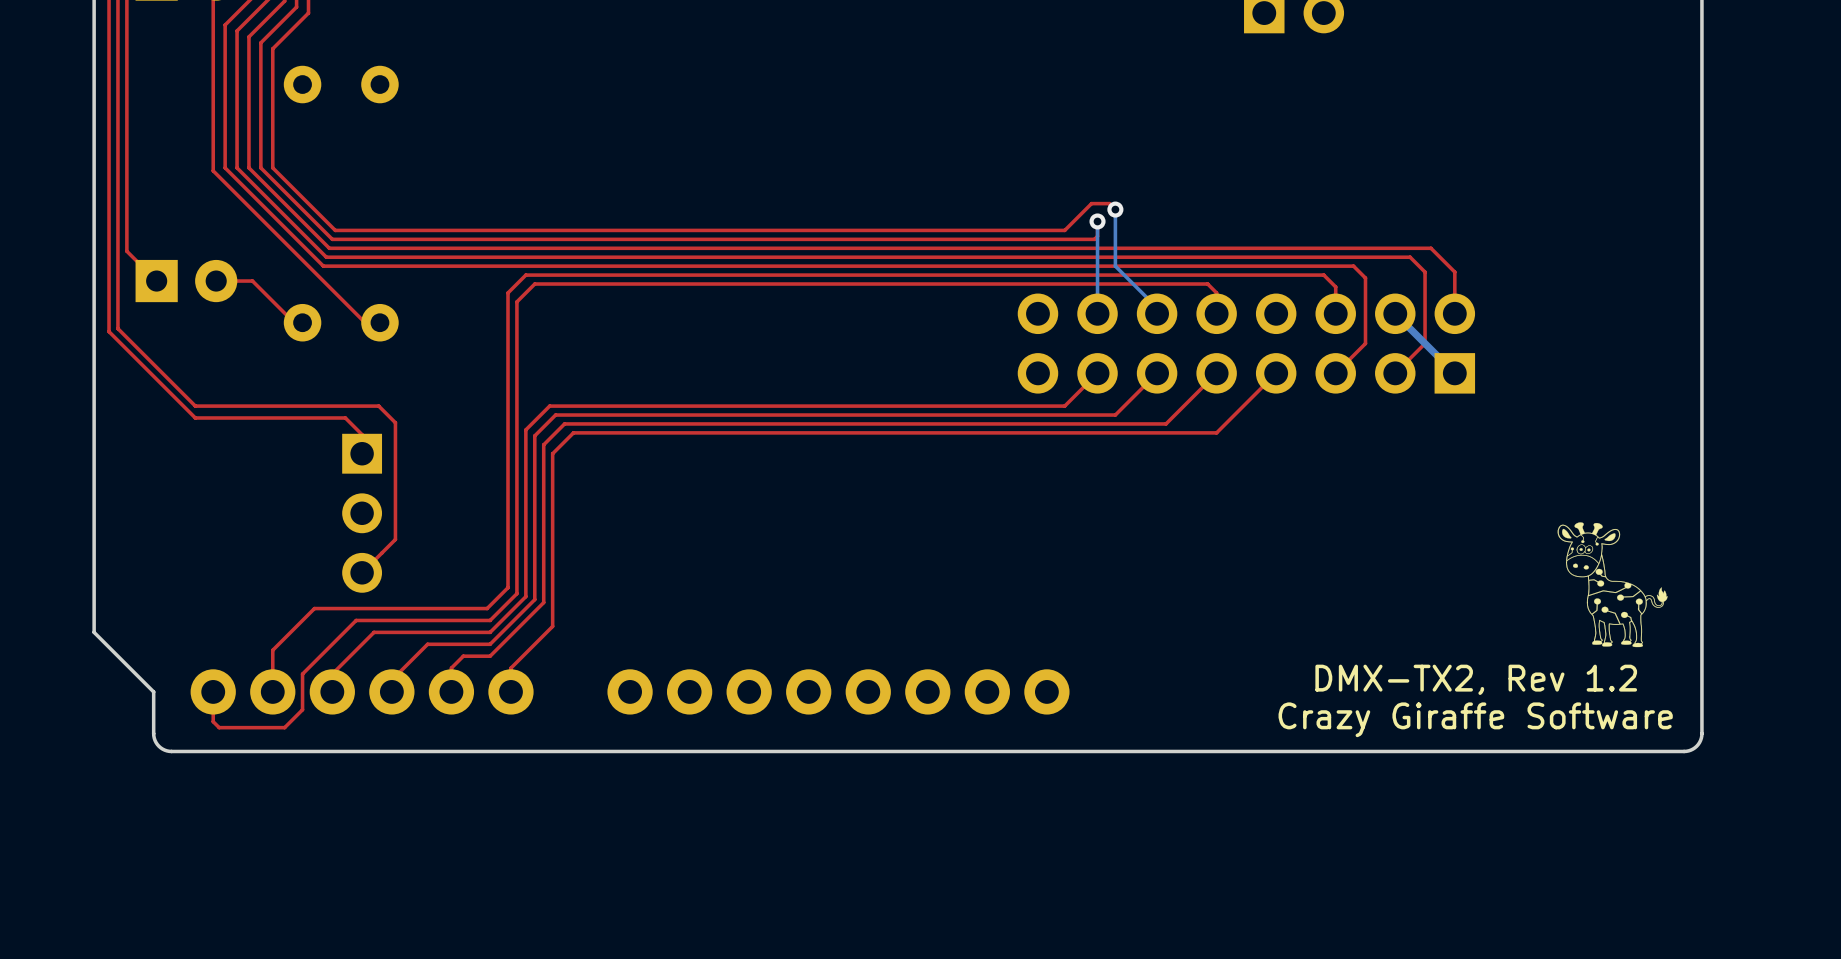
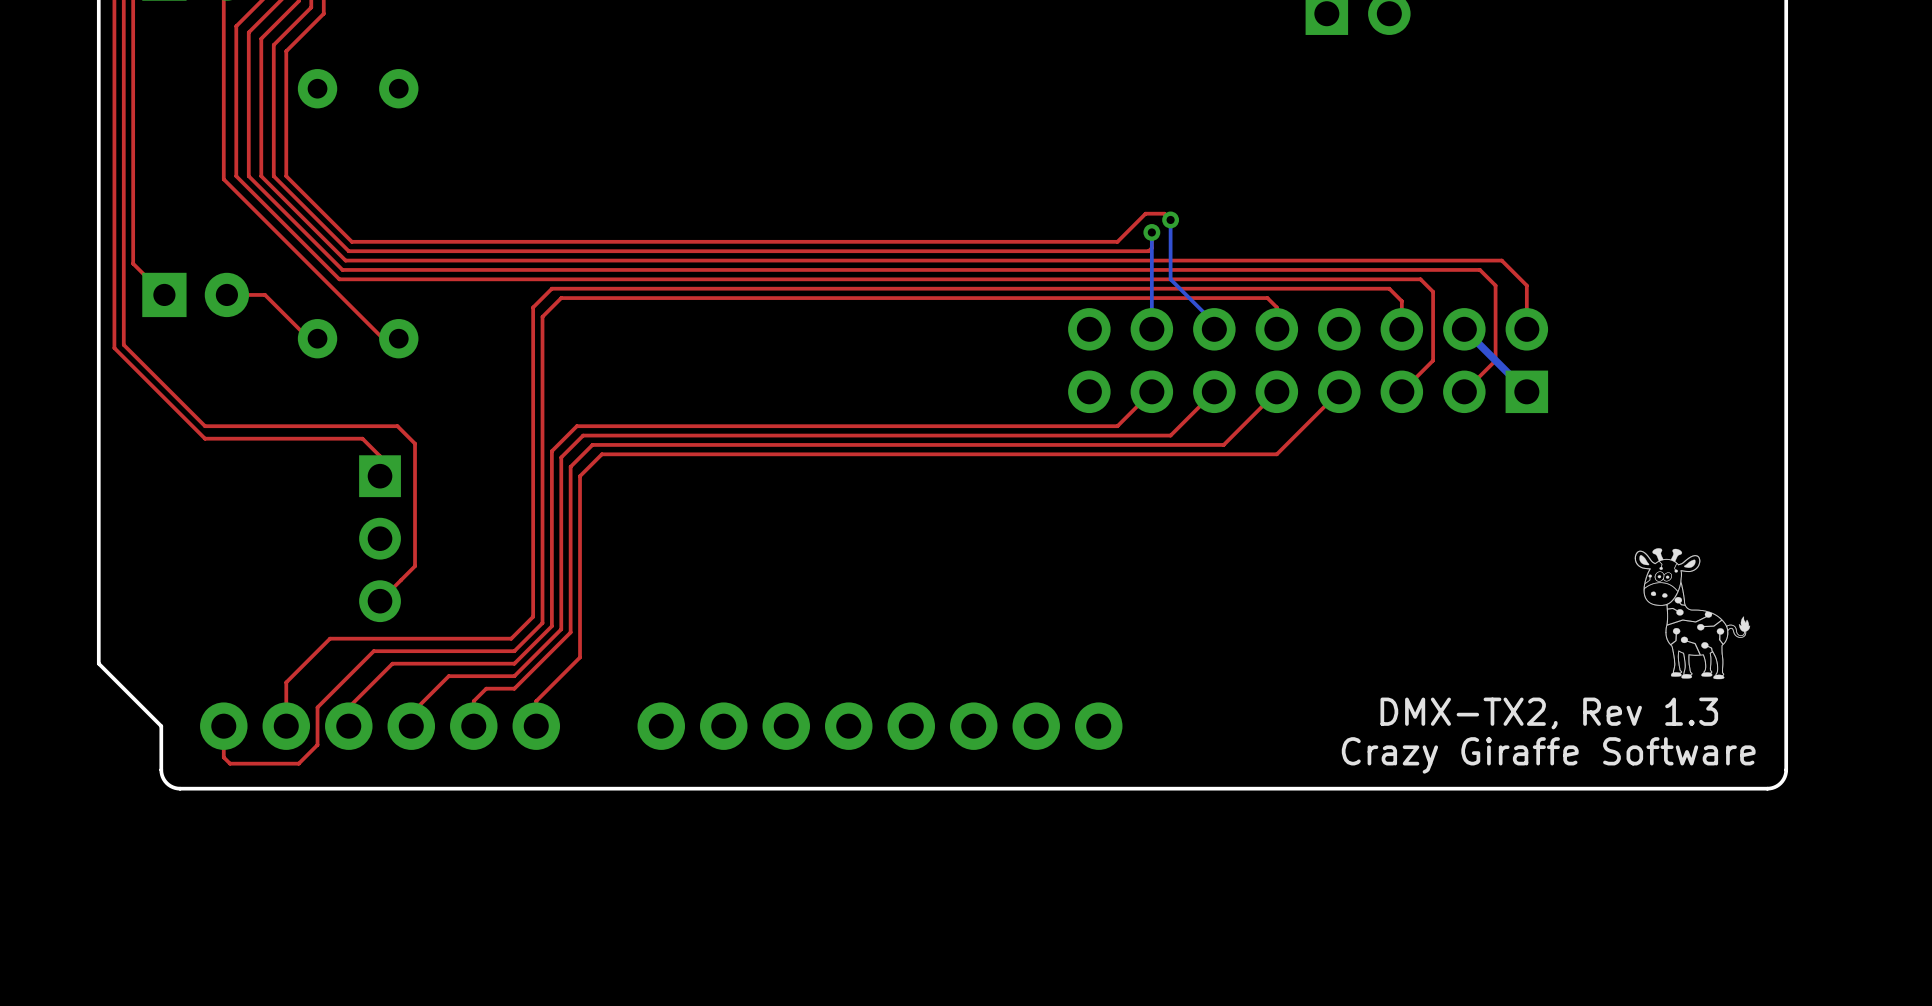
text: DMX-TX2, Rev 1.2 (1476, 679) -> DMX-TX2, Rev 1.3 (1549, 713)

